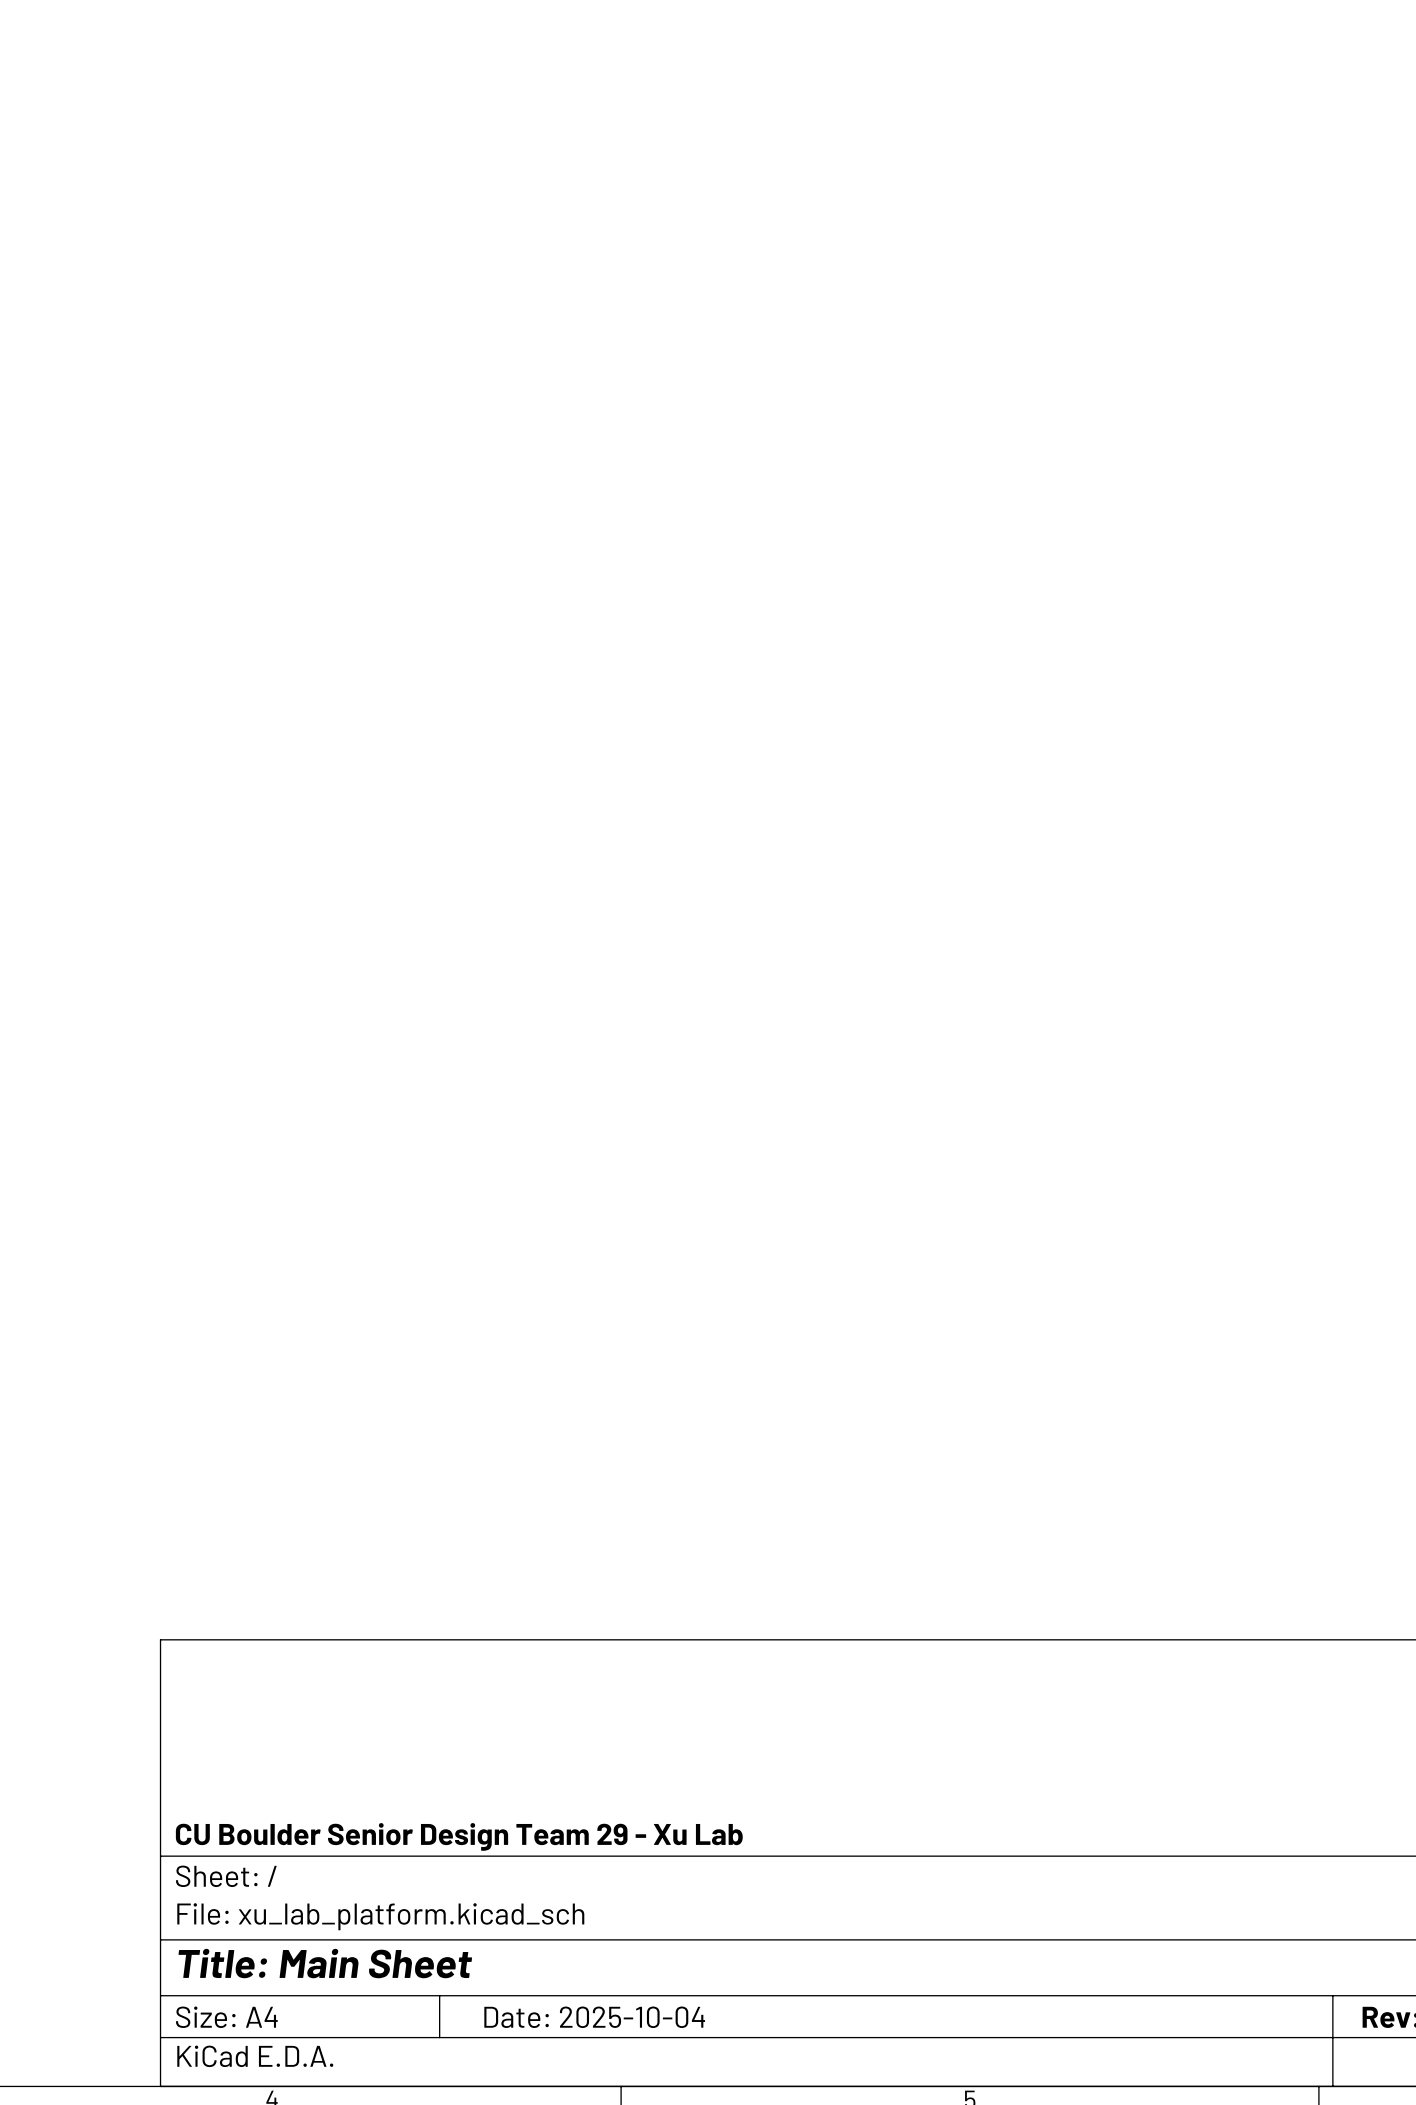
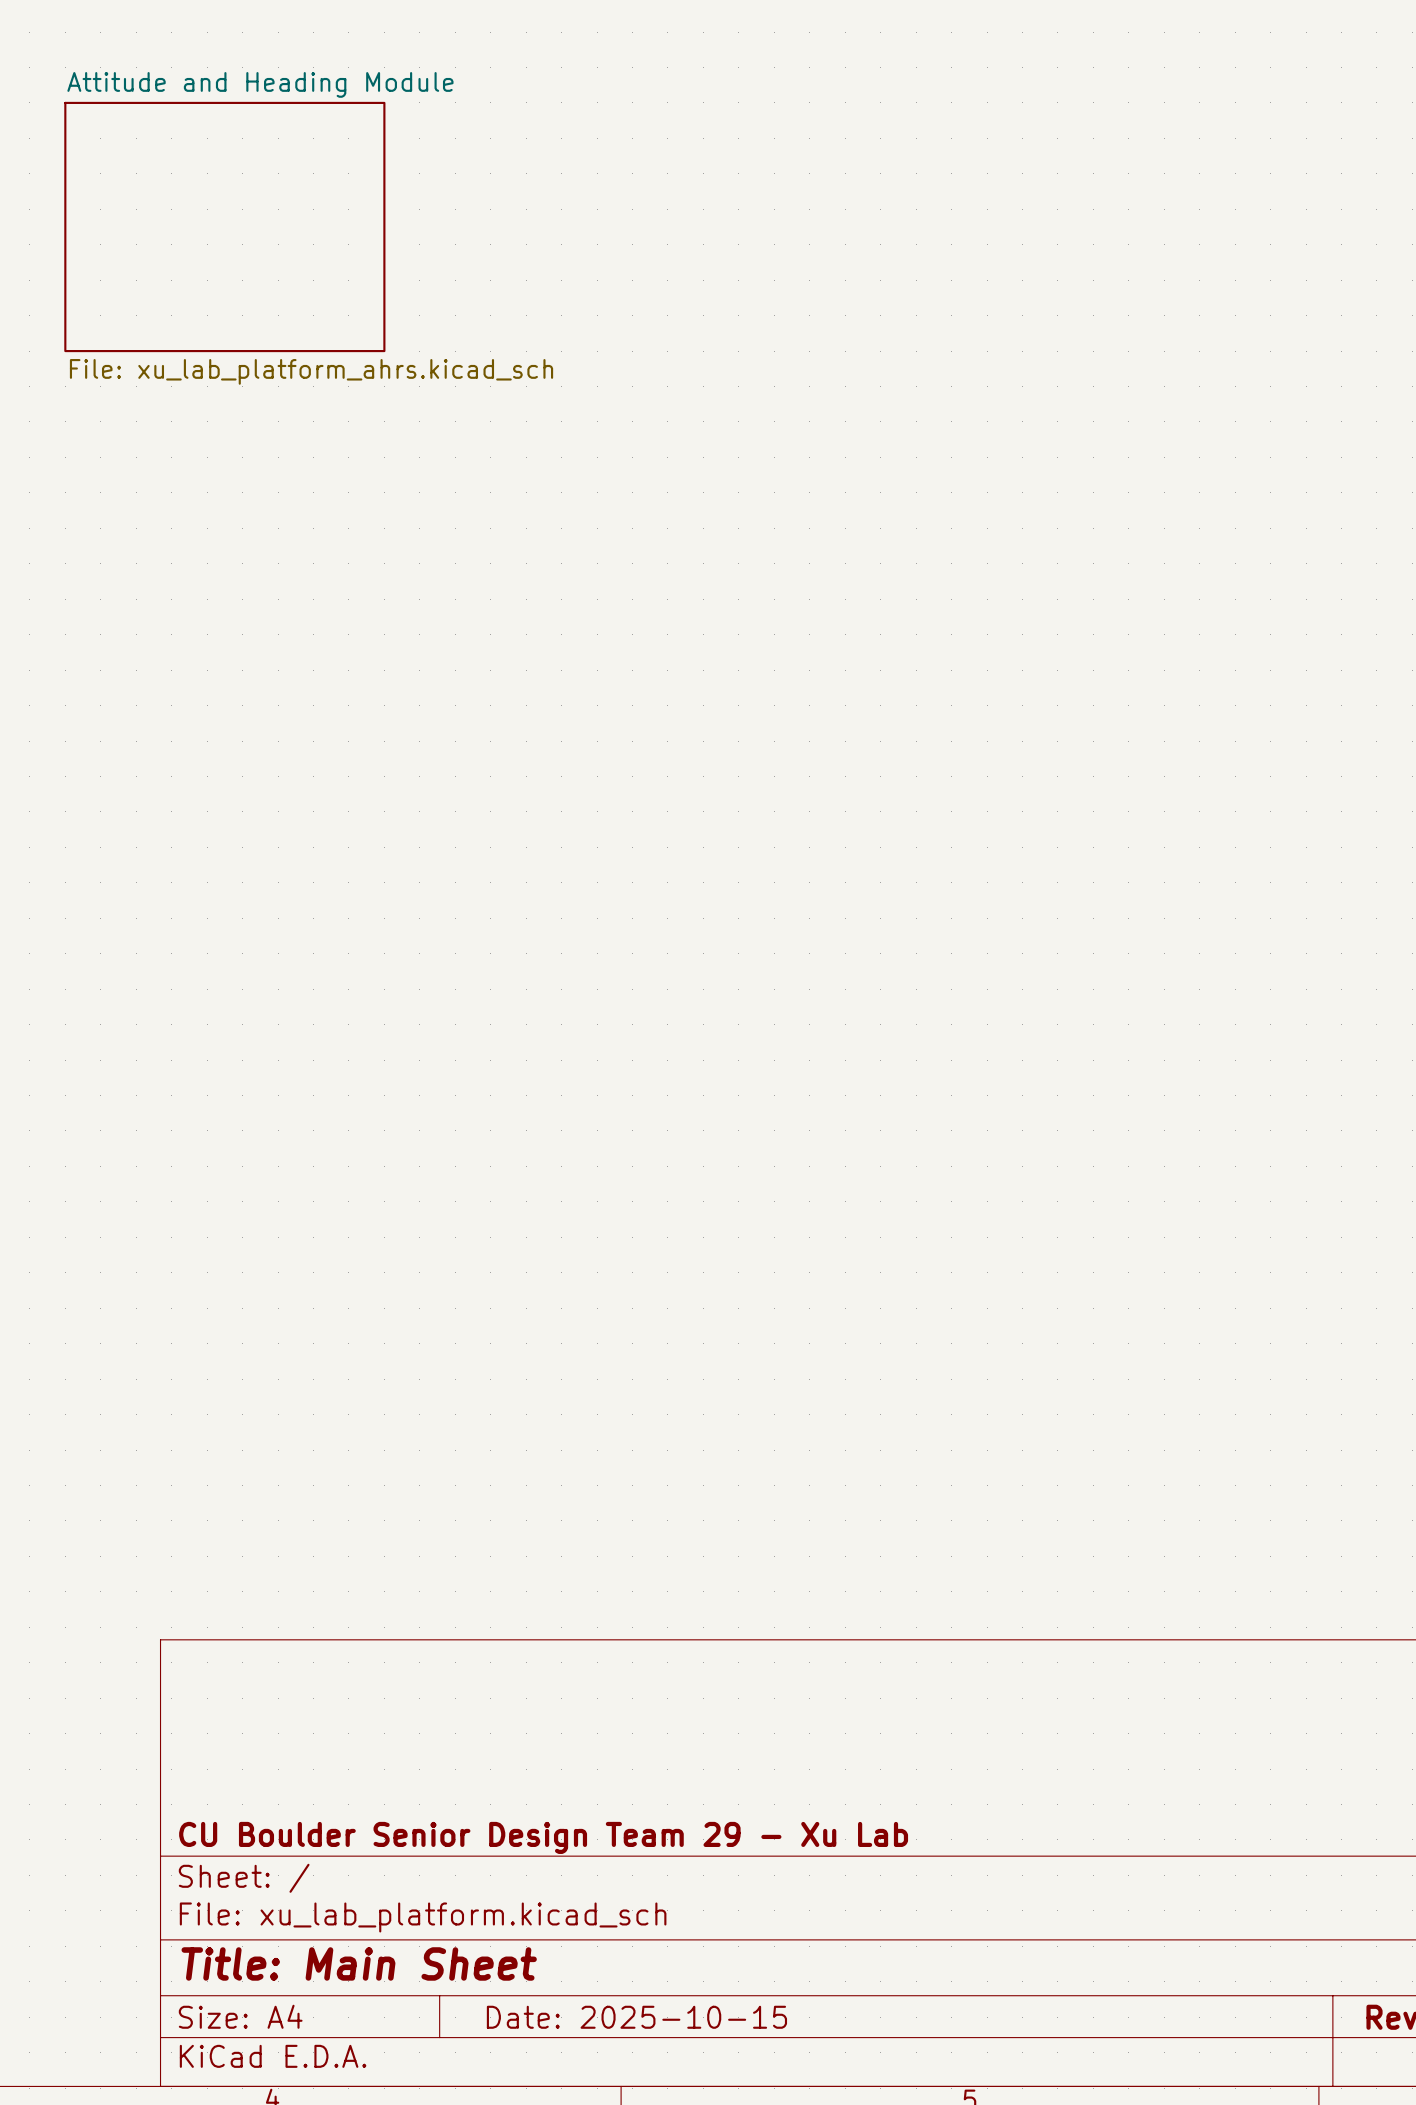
sheet Attitude and Heading Module: none -> File: xu_lab_platform_ahrs.kicad_sch (224, 226)
title block: Date: 2025-10-04 (594, 2017) -> Date: 2025-10-15 (636, 2017)

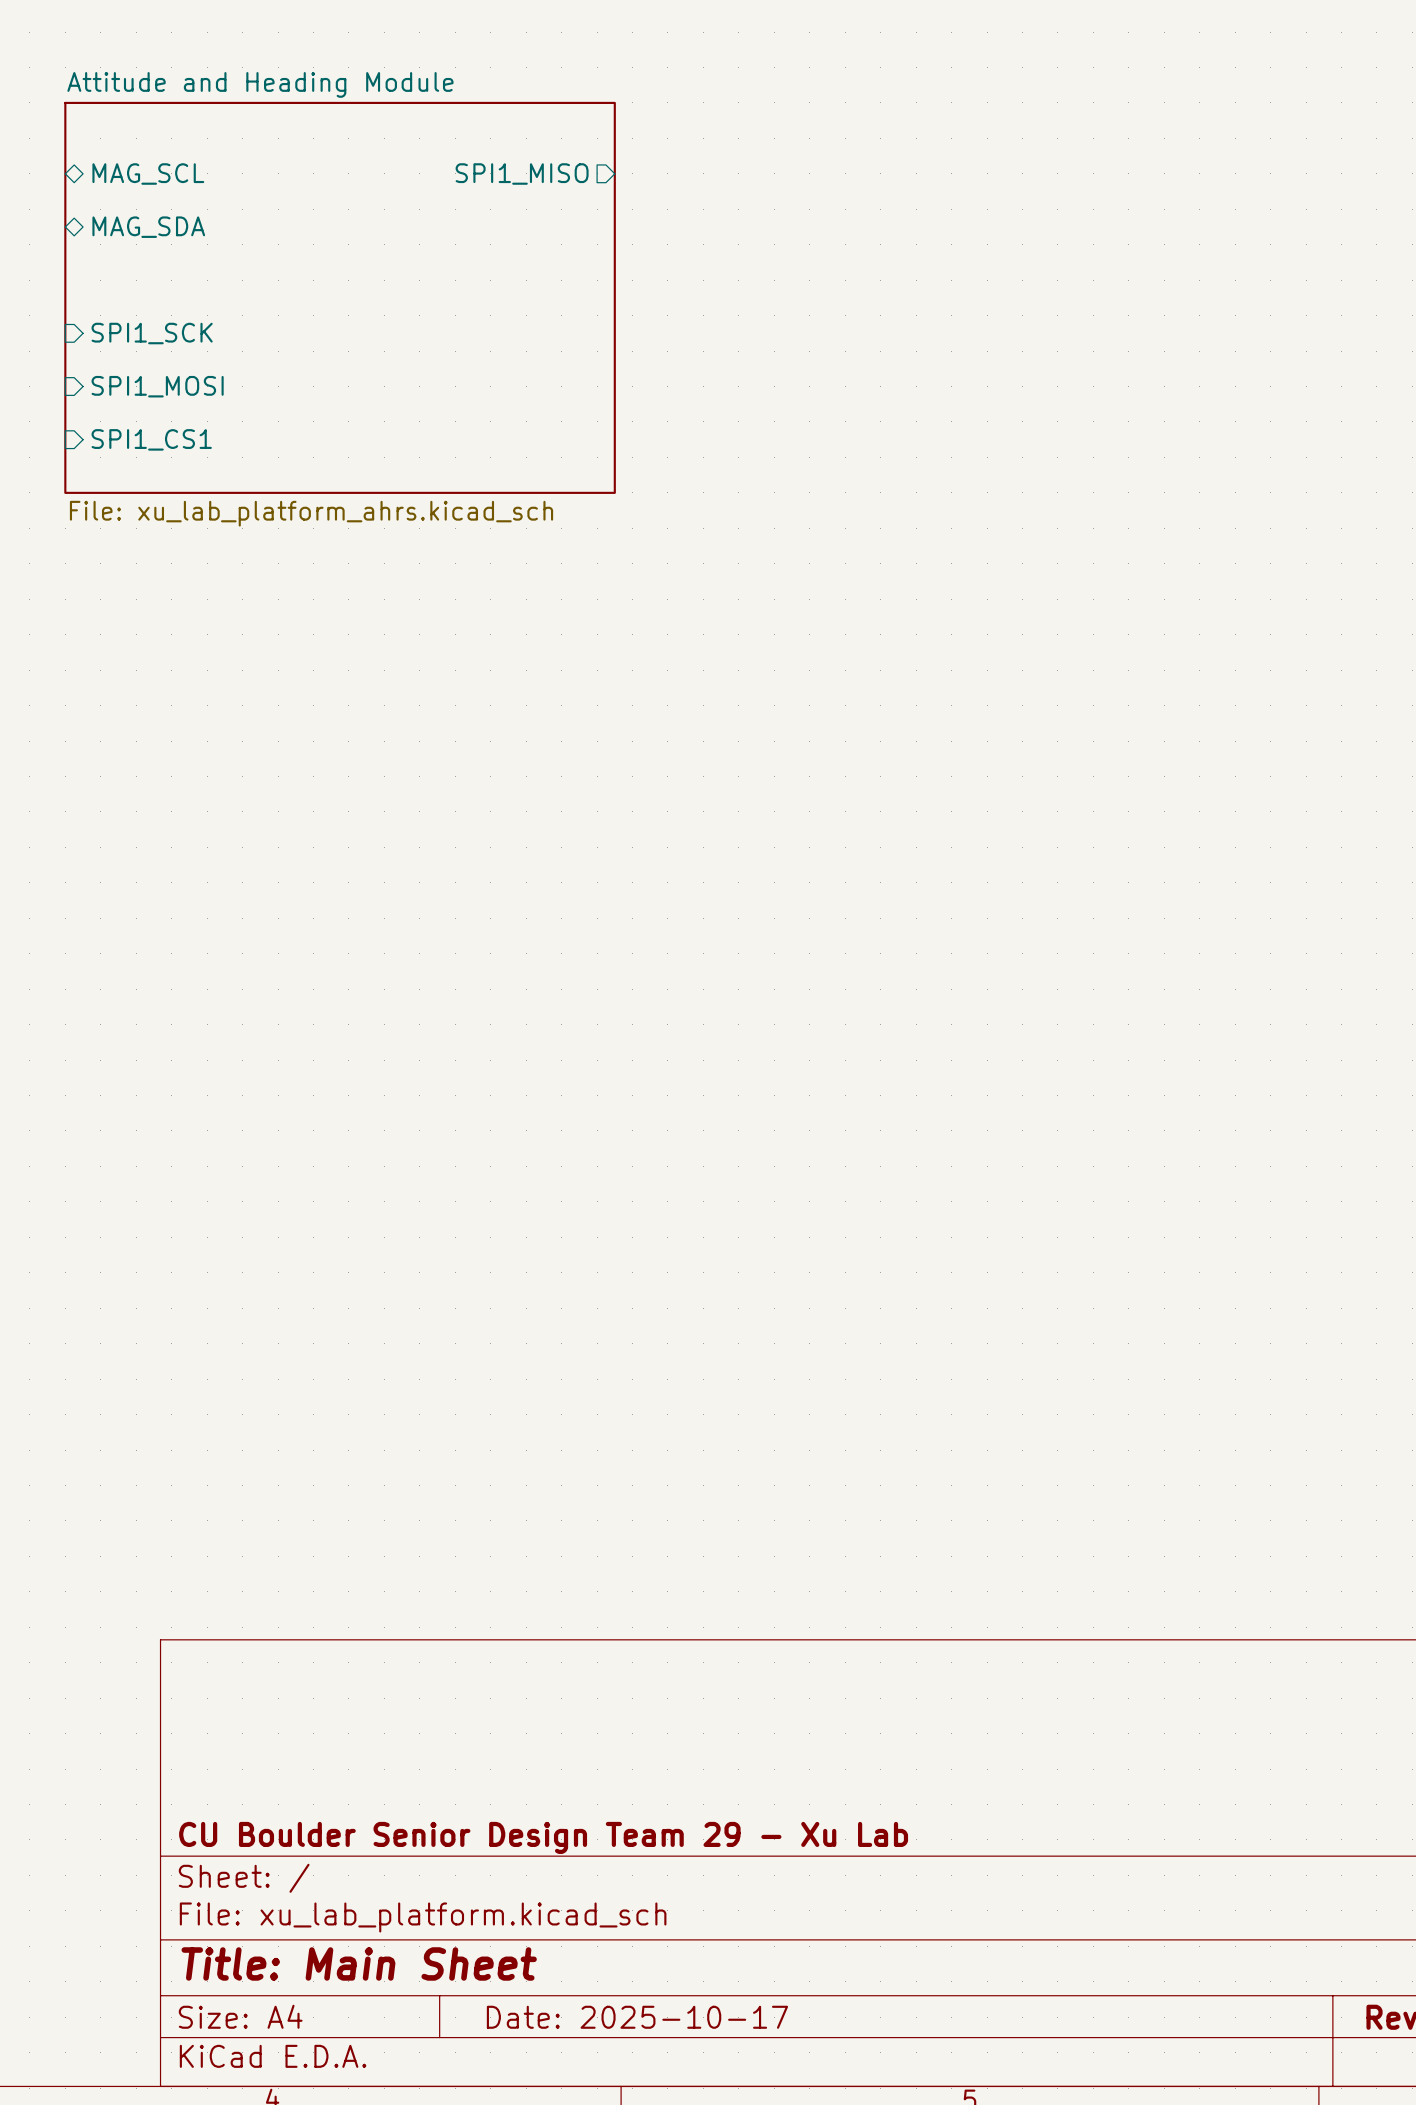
sheet pin: none -> MAG_SCL (148, 174)
sheet pin: none -> SPI1_MISO (522, 174)
sheet Attitude and Heading Module: File: xu_lab_platform_ahrs.kicad_sch (224, 226) -> none
sheet pin: none -> MAG_SDA (148, 227)
sheet Attitude and Heading Module: none -> File: xu_lab_platform_ahrs.kicad_sch (340, 297)
sheet pin: none -> SPI1_SCK (152, 333)
sheet pin: none -> SPI1_MOSI (157, 386)
sheet pin: none -> SPI1_CS1 (151, 439)
title block: Date: 2025-10-15 (636, 2017) -> Date: 2025-10-17 (637, 2017)

